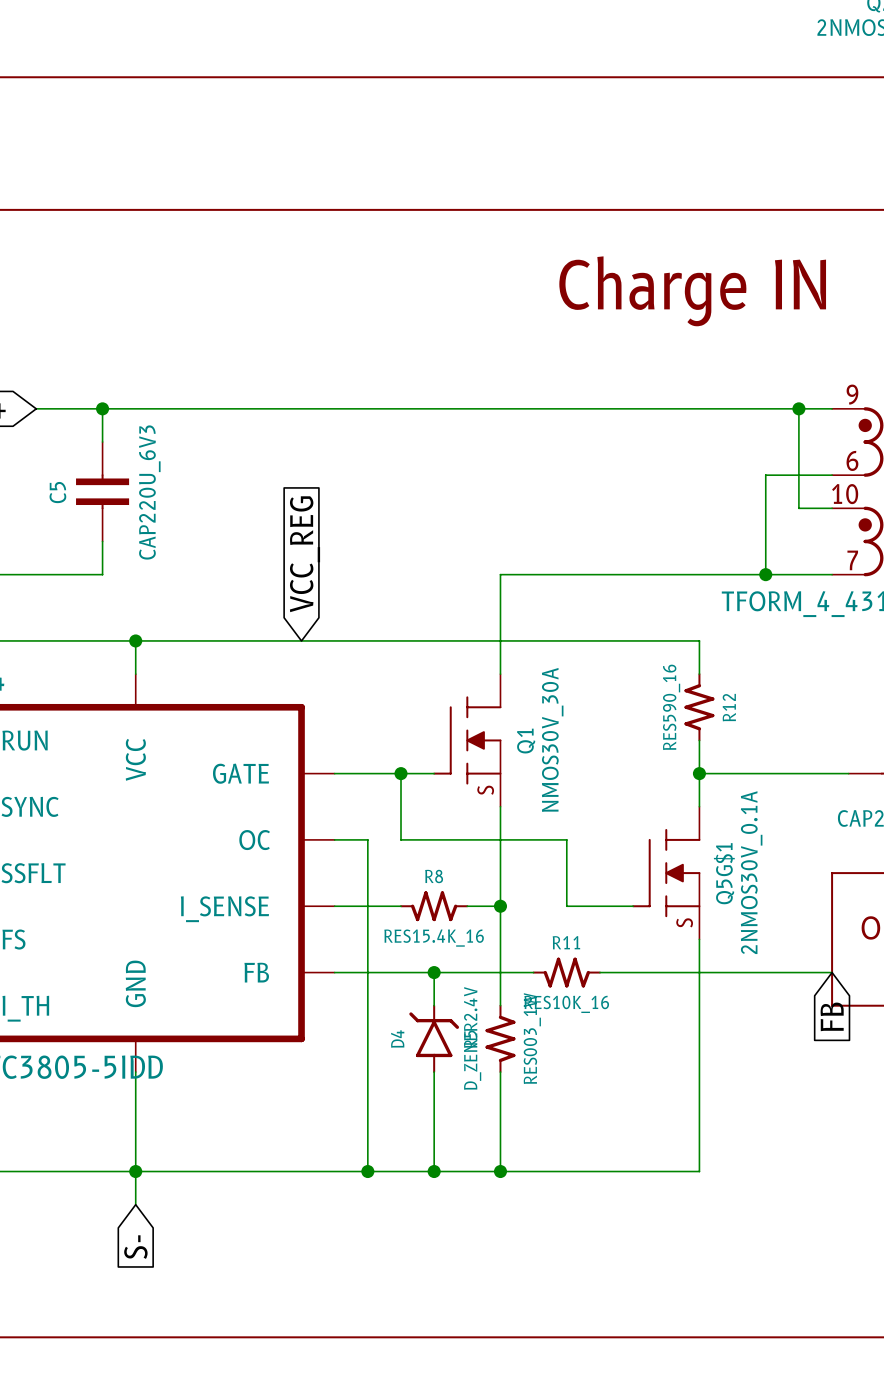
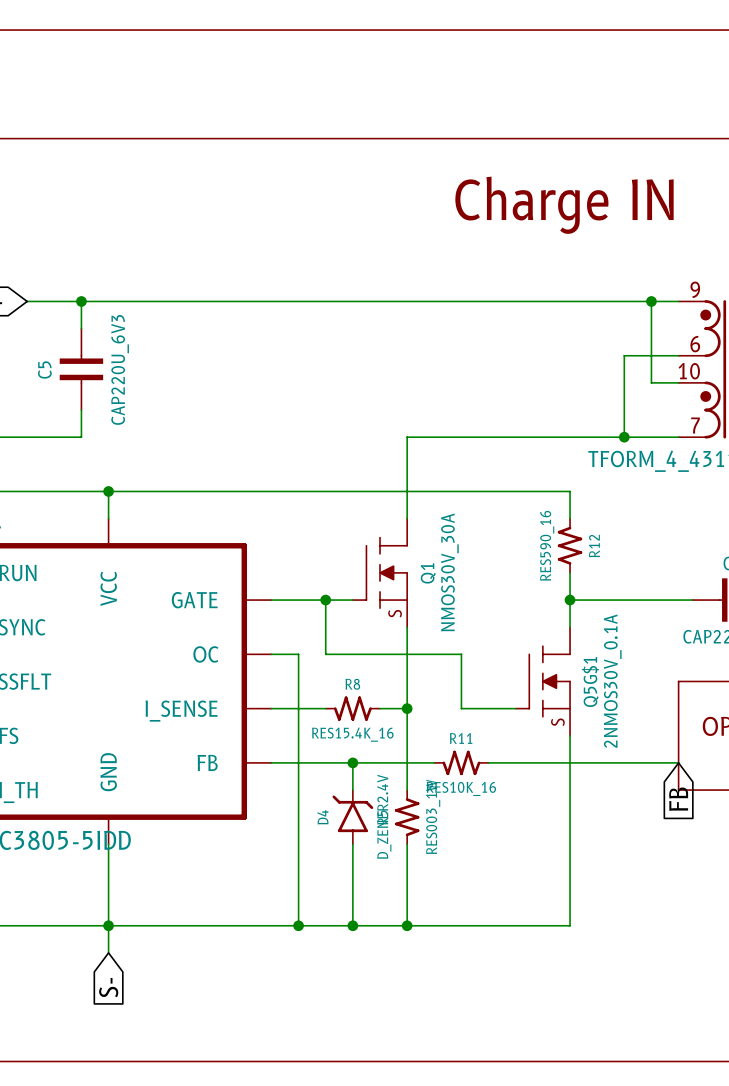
global label: VCC_REG (304, 554) -> none

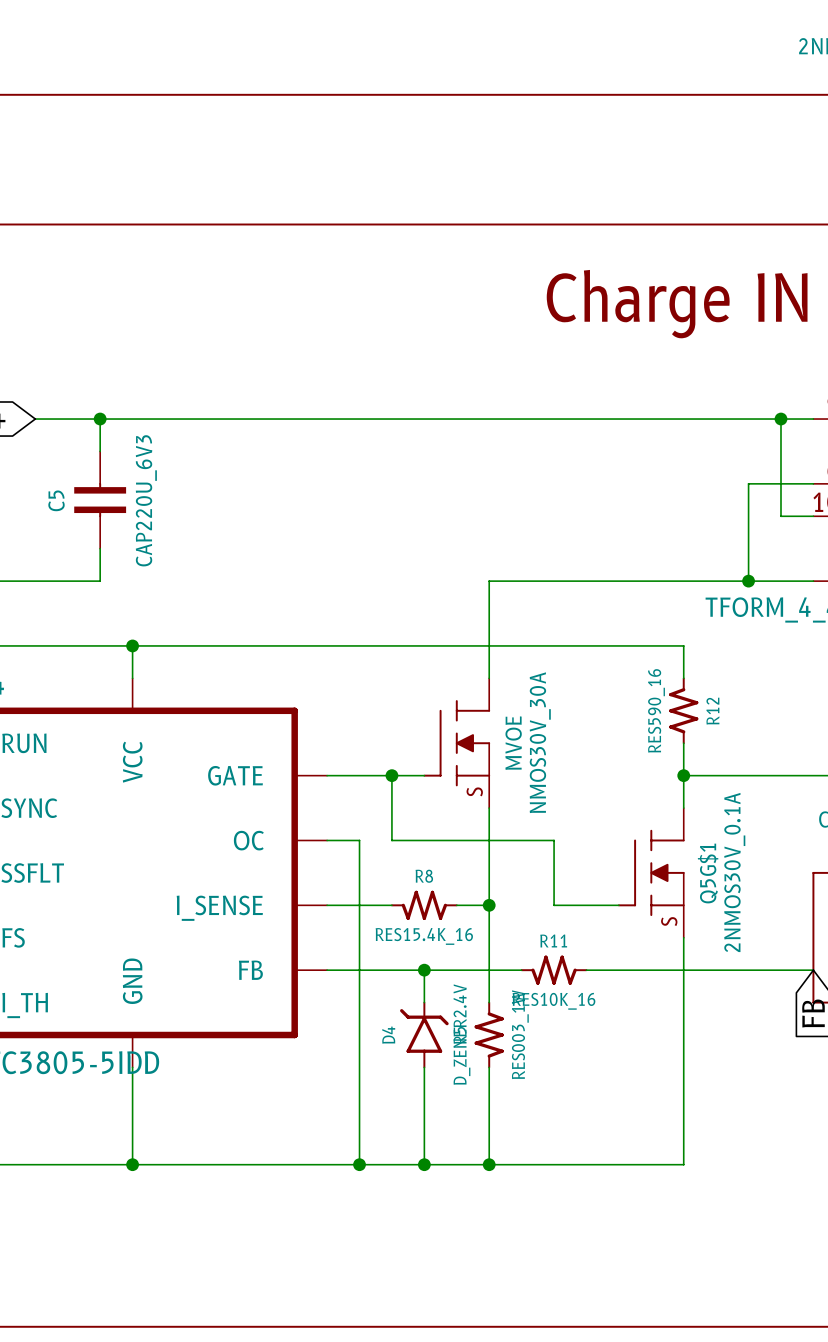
Q1 name: Q1 (428, 573) -> MVOE (513, 743)
wire: (108, 925) (108, 952) -> none
global label: S- (108, 987) -> none

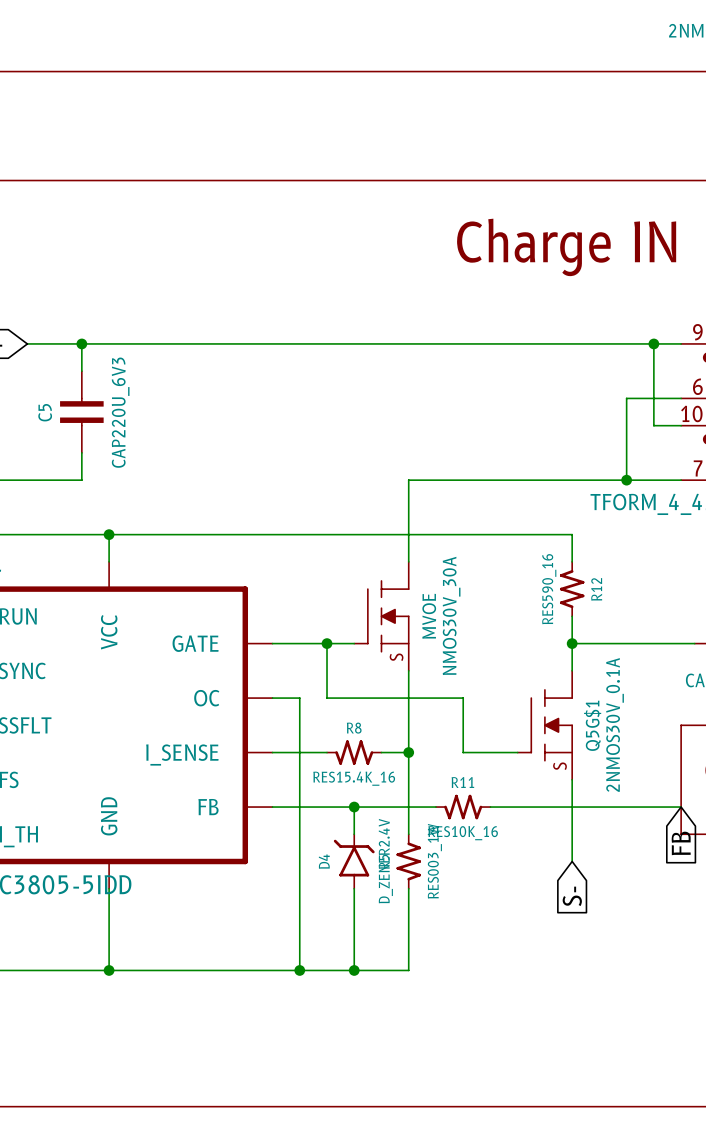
wire: (683, 1035) (683, 1164) (489, 1164) -> none
global label: none -> S- (572, 896)
junction: (489, 1164) -> none

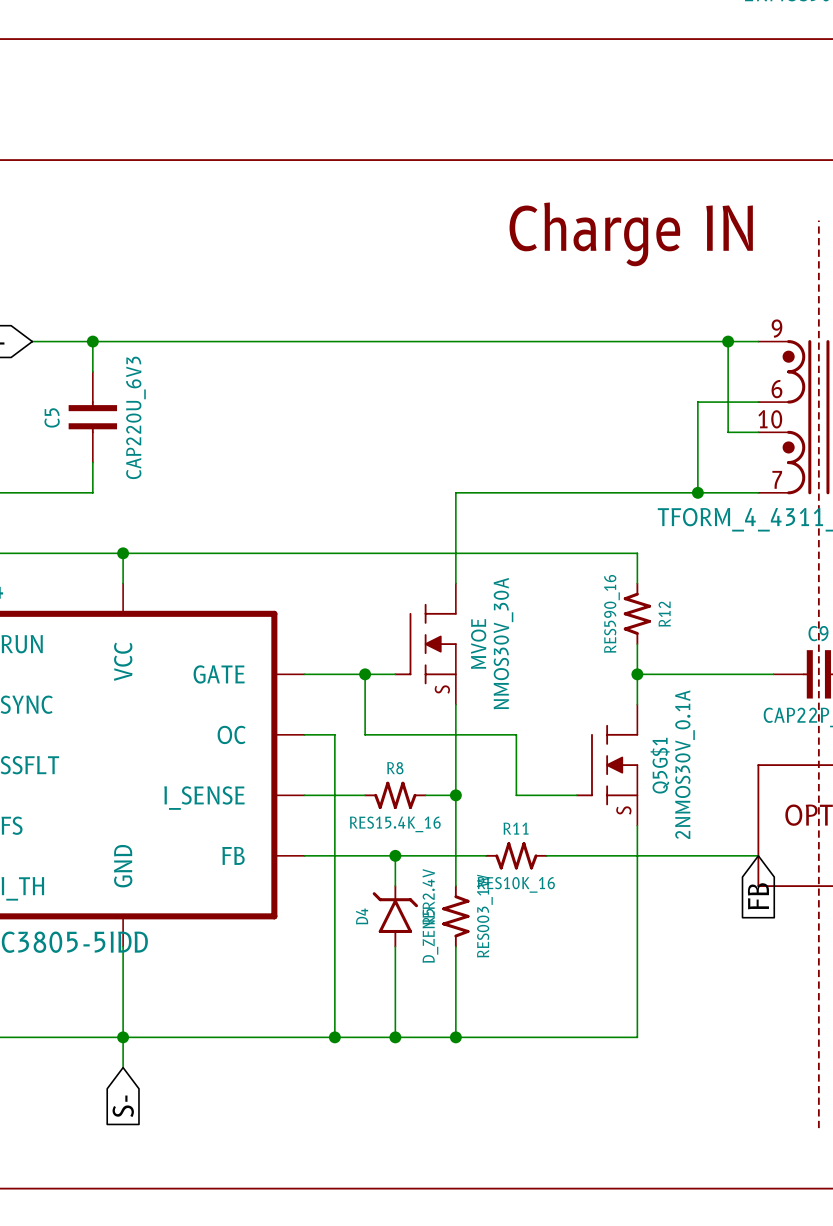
wire: none -> (637, 916) (637, 1037) (455, 1037)
global label: S- (572, 896) -> none
wire: none -> (123, 1037) (123, 1067)
junction: none -> (455, 1037)
global label: none -> S- (123, 1106)

